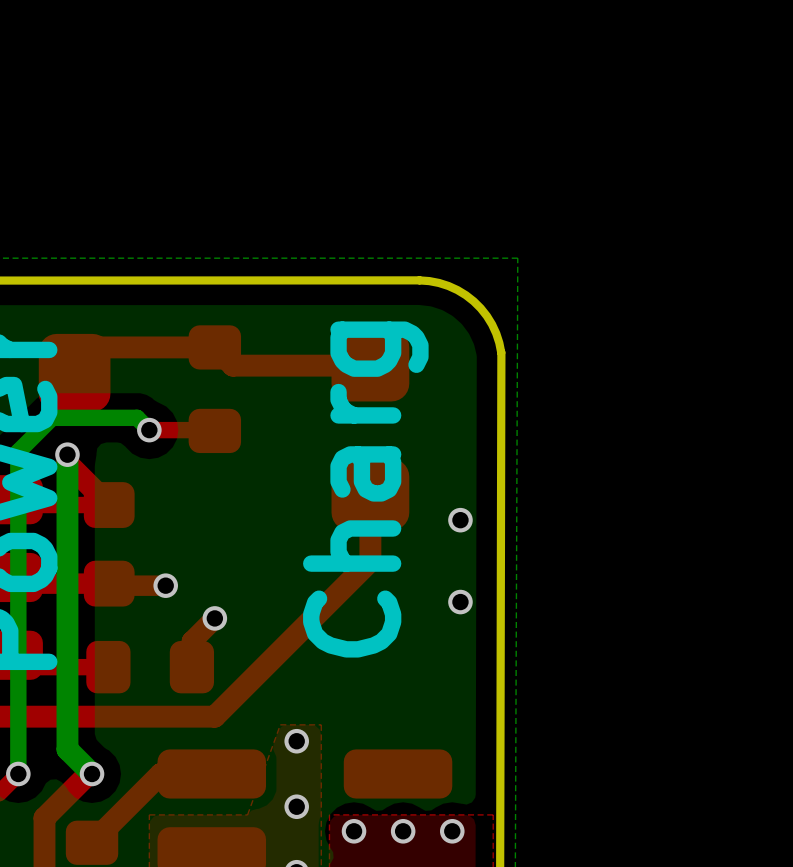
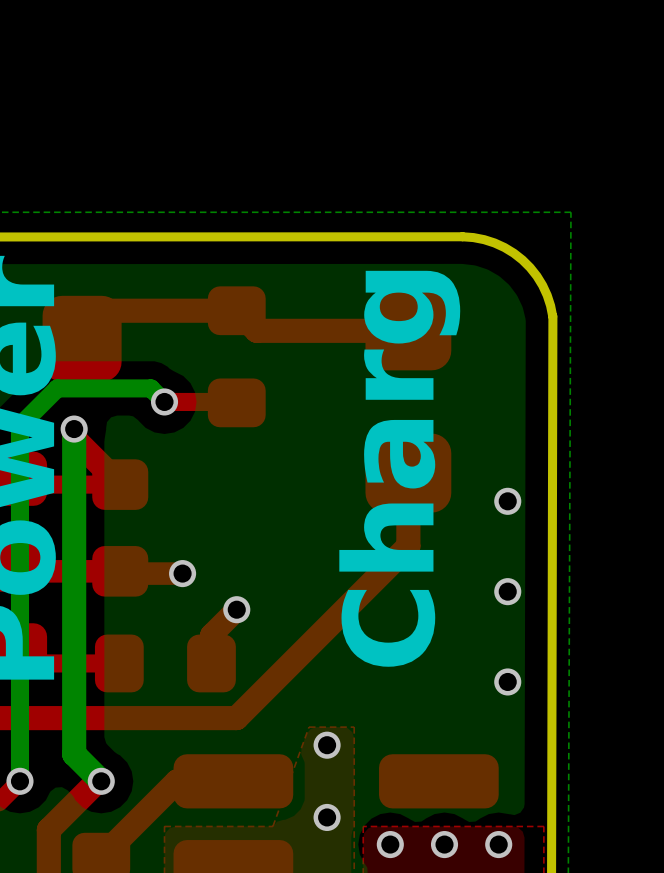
via: none -> (507, 681)

